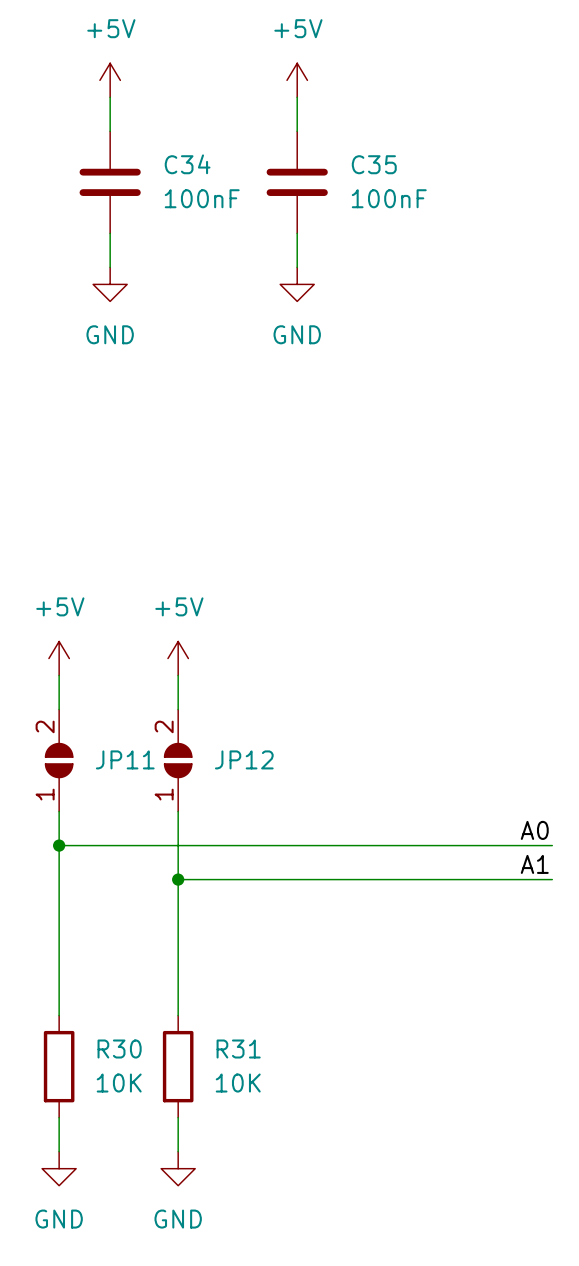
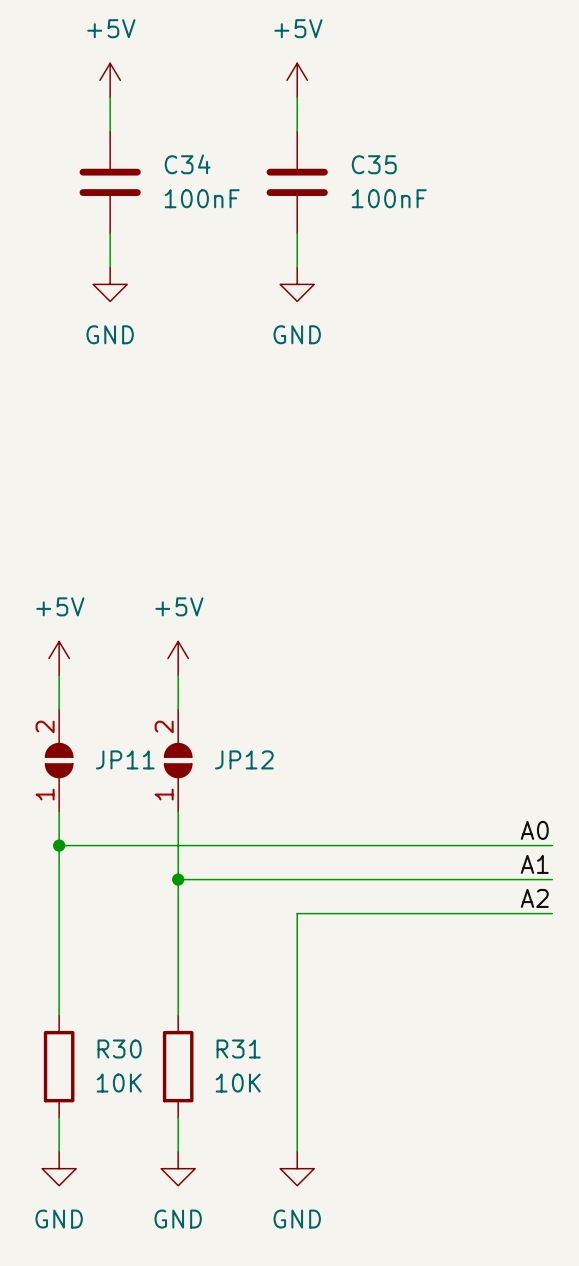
label: none -> A2 (534, 898)
wire: none -> (552, 913) (297, 913) (297, 1151)
power symbol: none -> GND (297, 1168)

